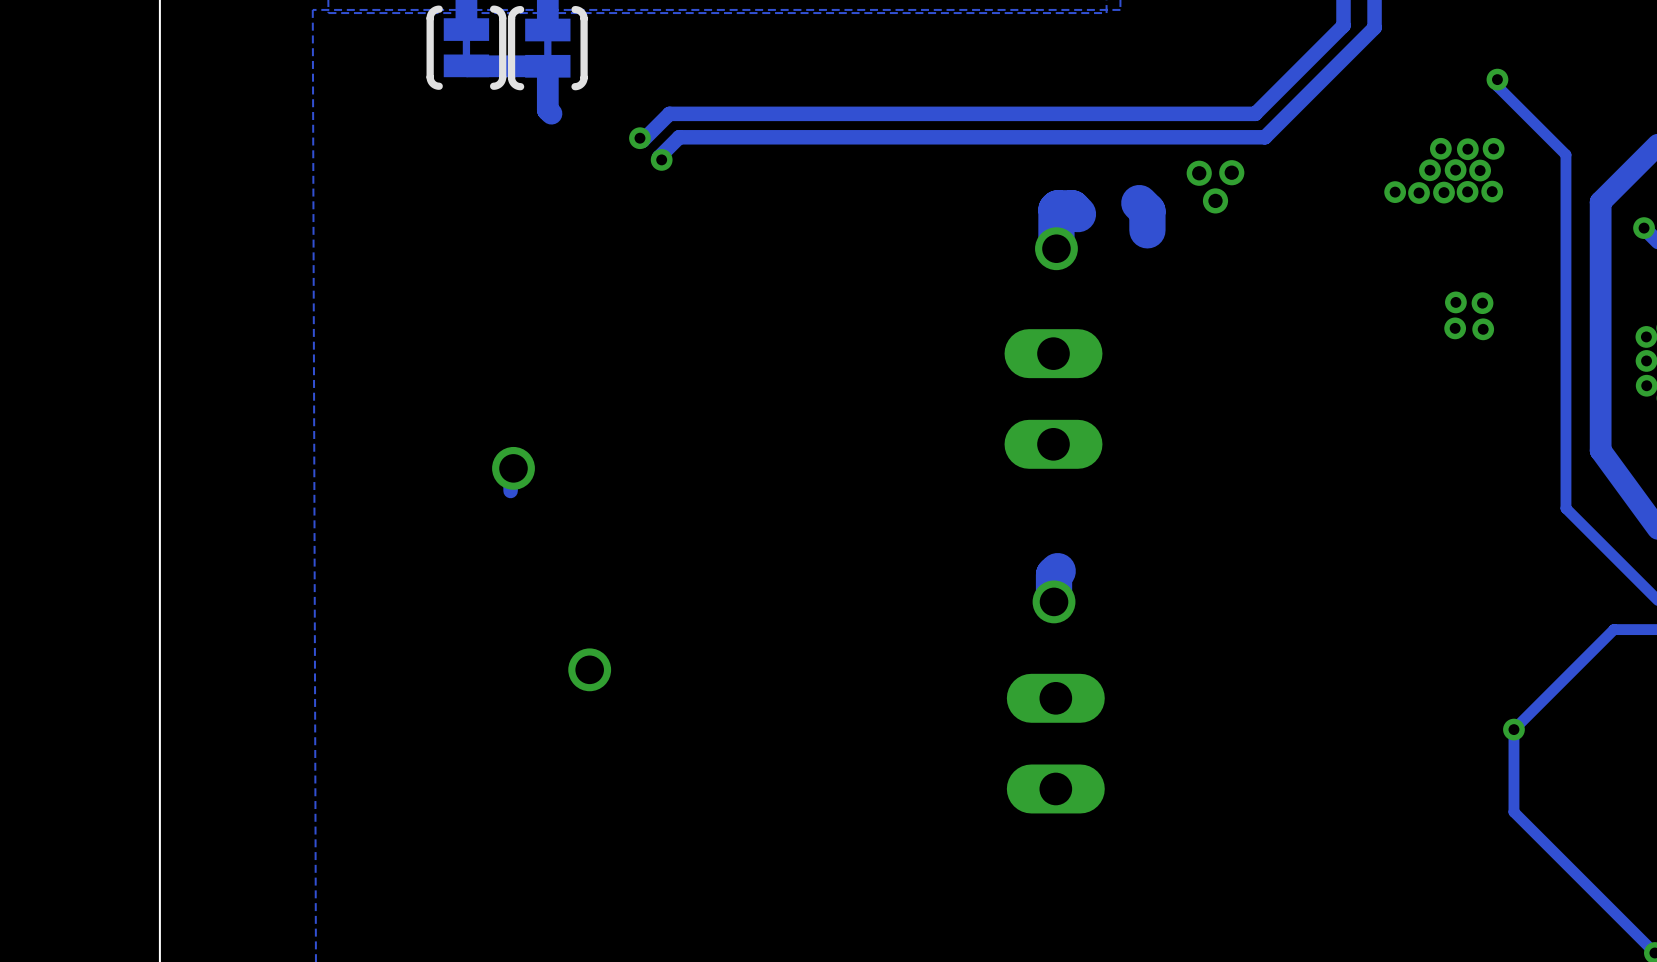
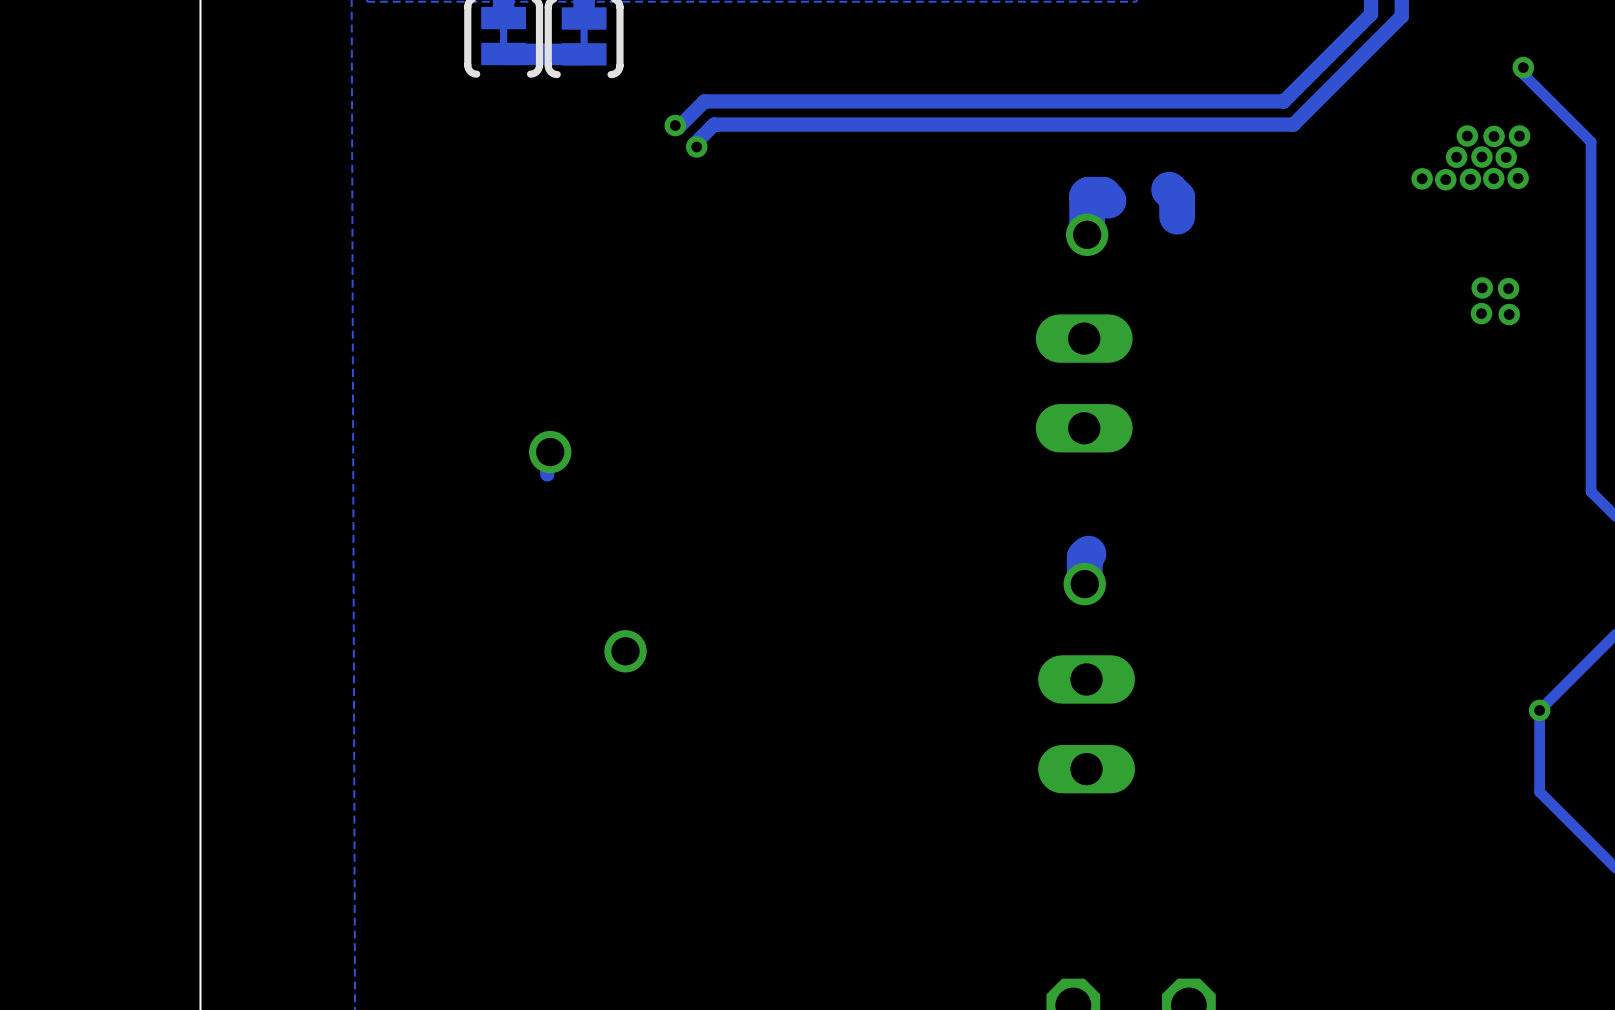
track: (547, 66) (547, 110) (551, 113) -> none
via: (1231, 172) -> none
via: (1199, 173) -> none
via: (1215, 200) -> none

